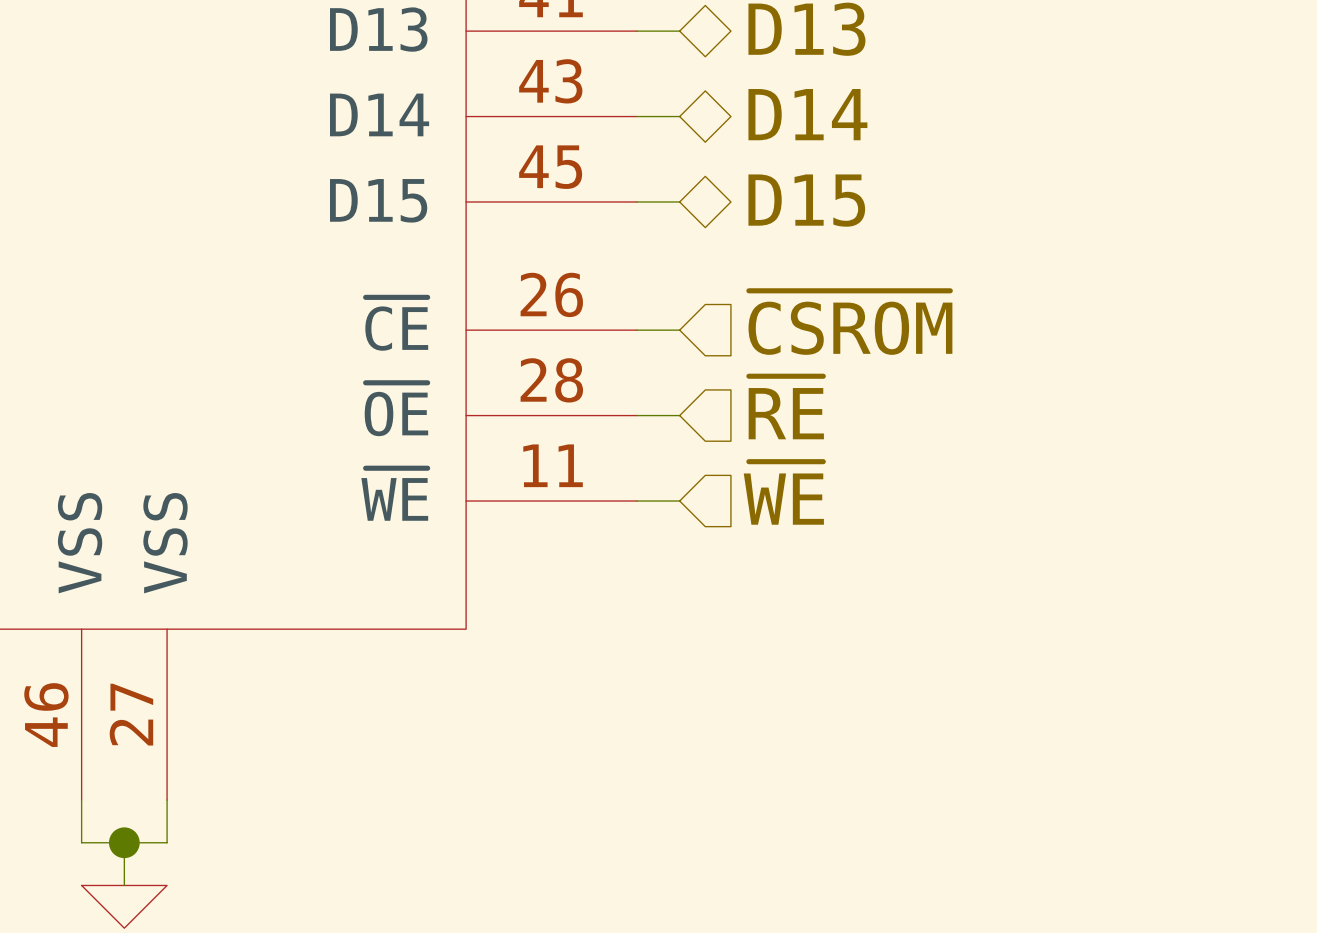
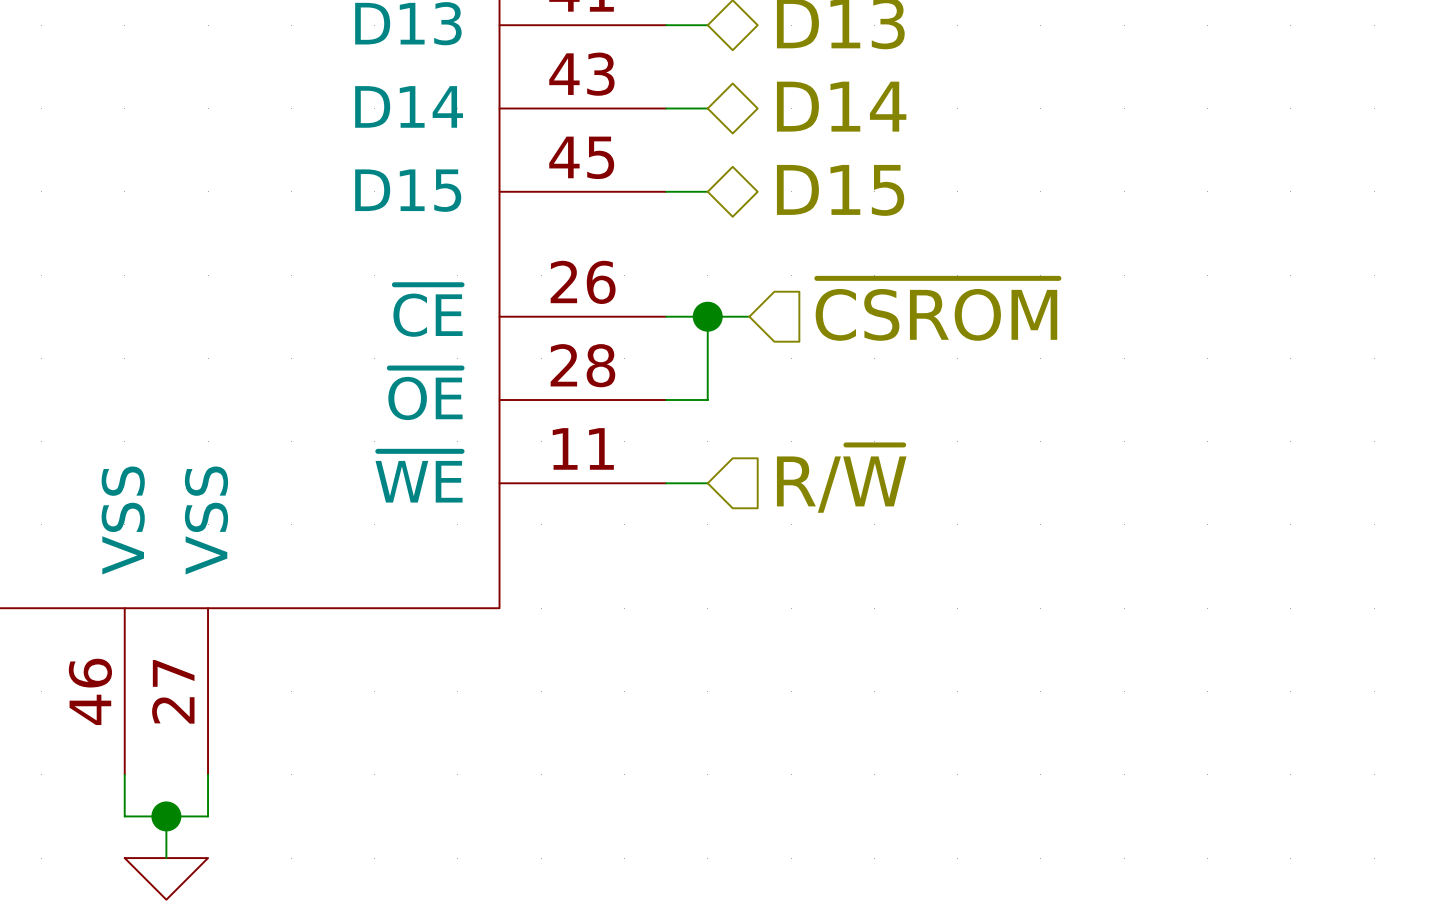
hierarchical label position: ~{CSROM} (850, 322) -> ~{CSROM} (937, 309)
junction: none -> (707, 316)
wire: none -> (749, 316) (707, 316) (707, 400)
hierarchical label: ~{RE} (786, 407) -> none
hierarchical label: ~{WE} (783, 493) -> R/~{W} (841, 478)

